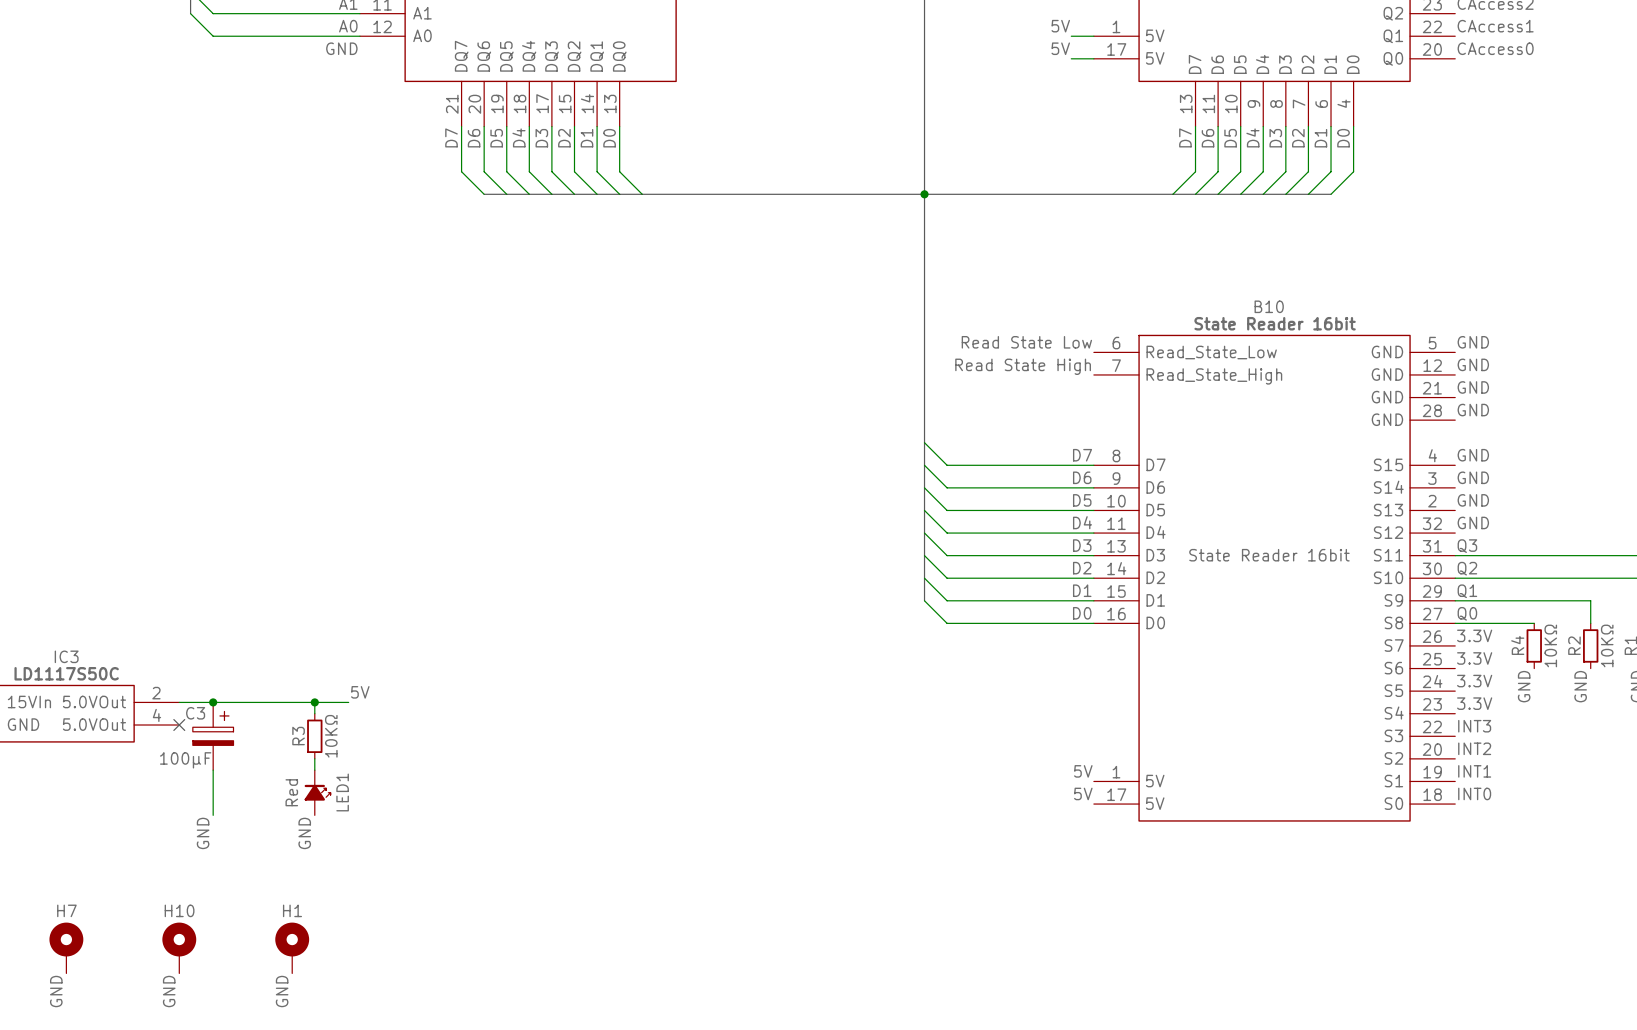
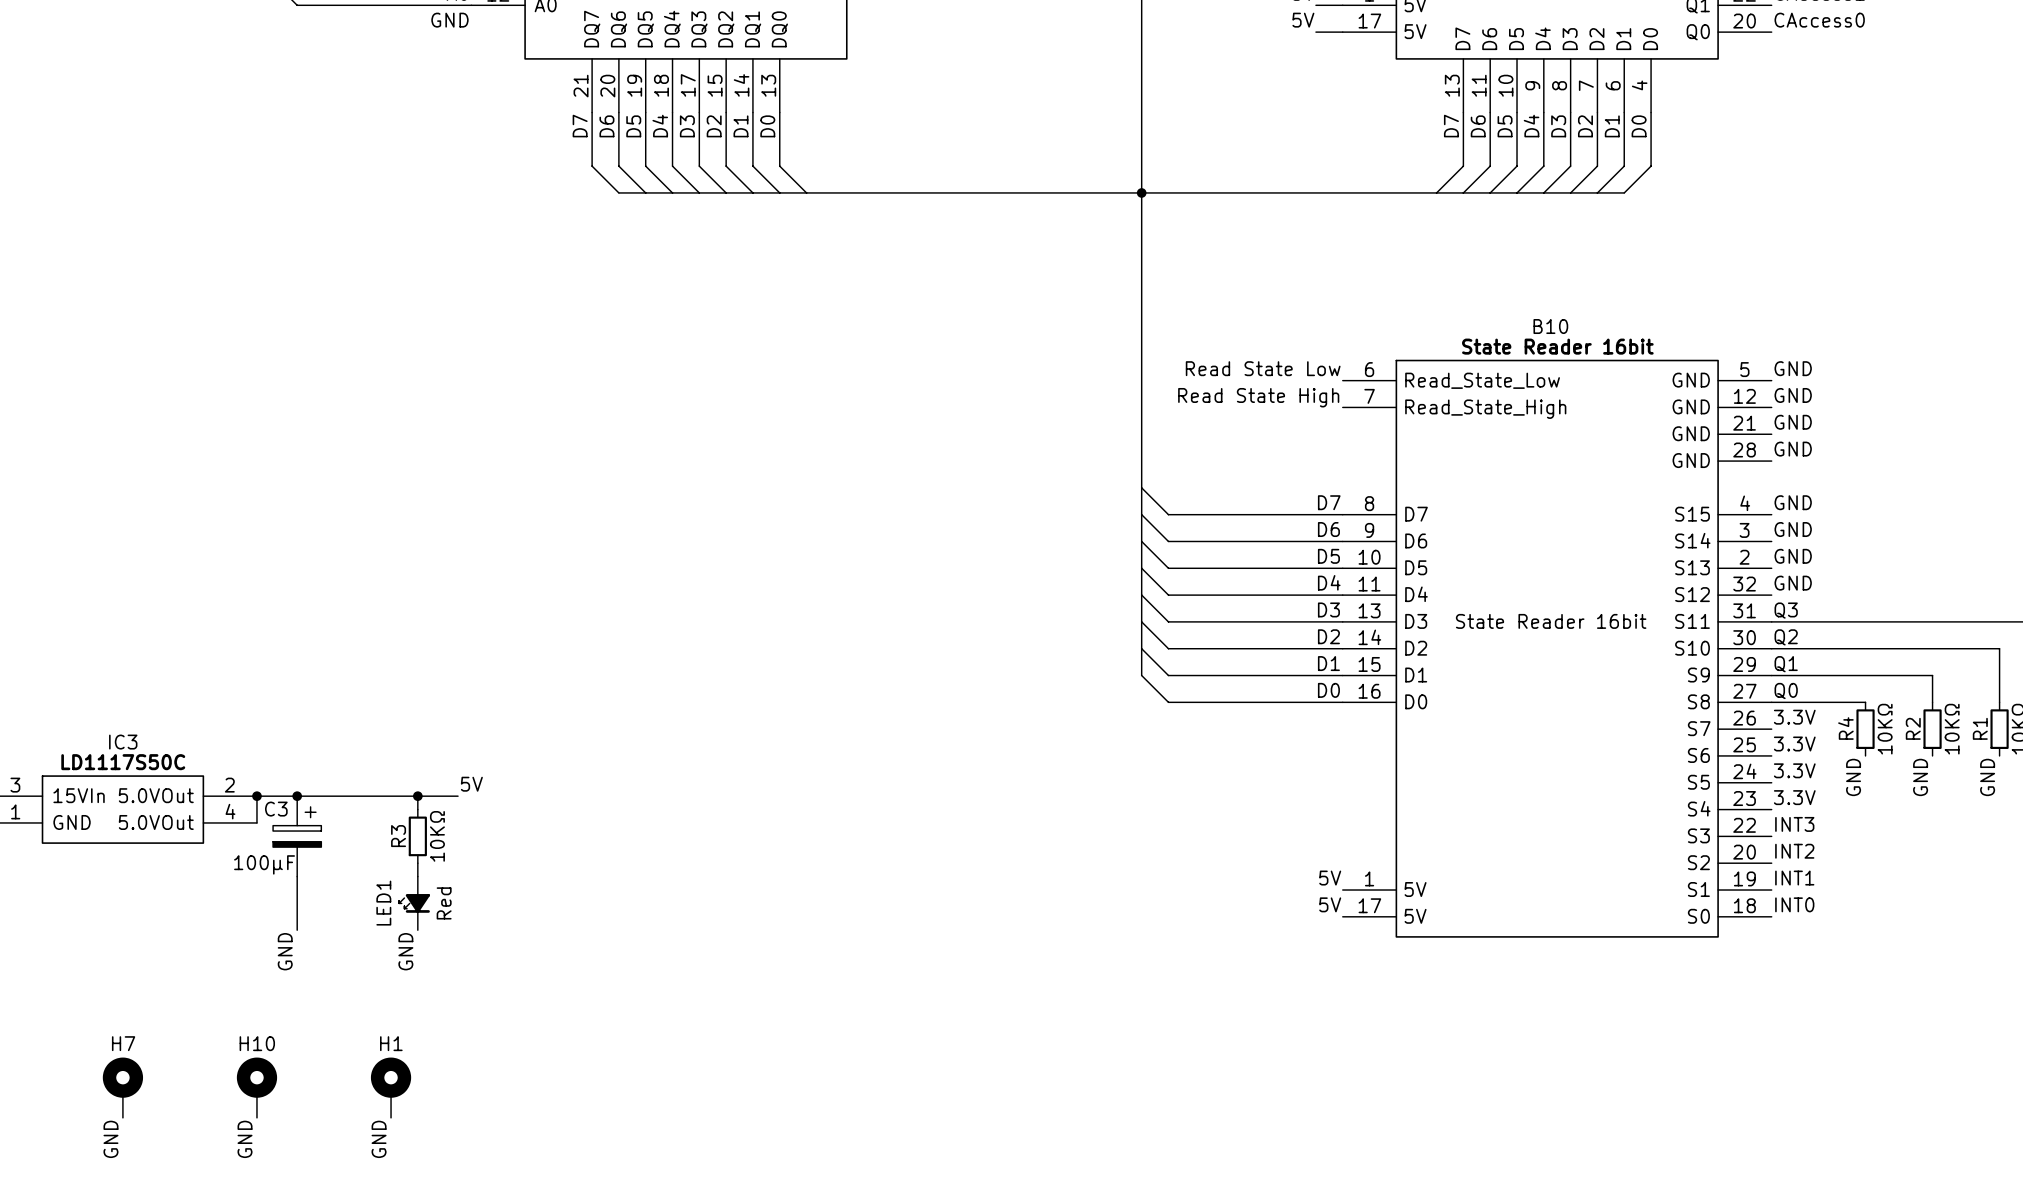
wire: none -> (256, 796) (256, 822)
junction: none -> (256, 796)
no-connect mark: (179, 725) -> none
LED1 rotation: 0° (317, 792) -> 180° (414, 903)

